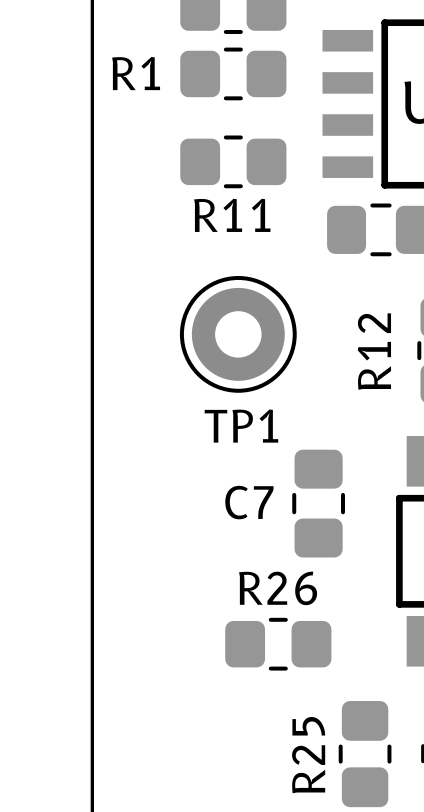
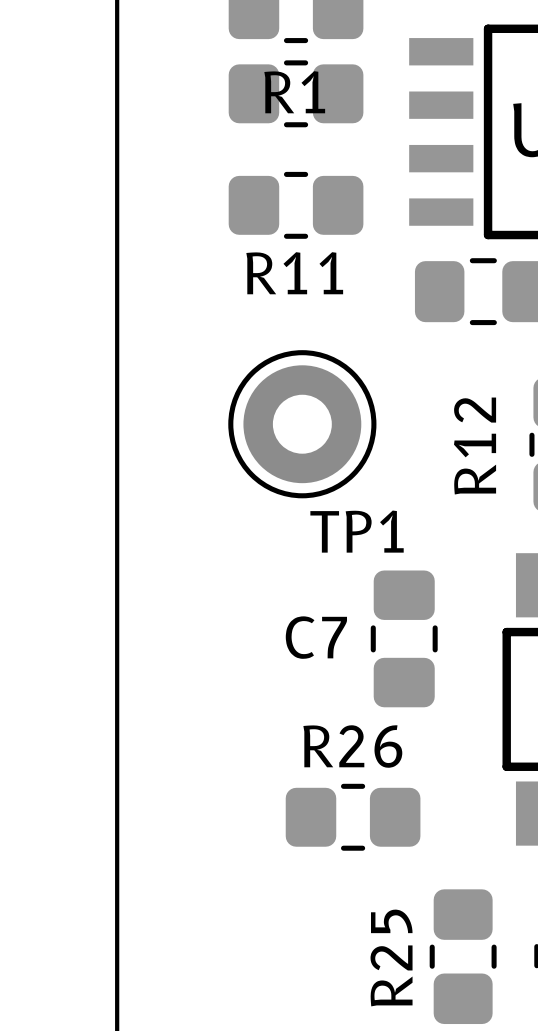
R1 name position: R1 (136, 73) -> R1 (294, 92)
TP1 name position: TP1 (241, 426) -> TP1 (357, 531)

